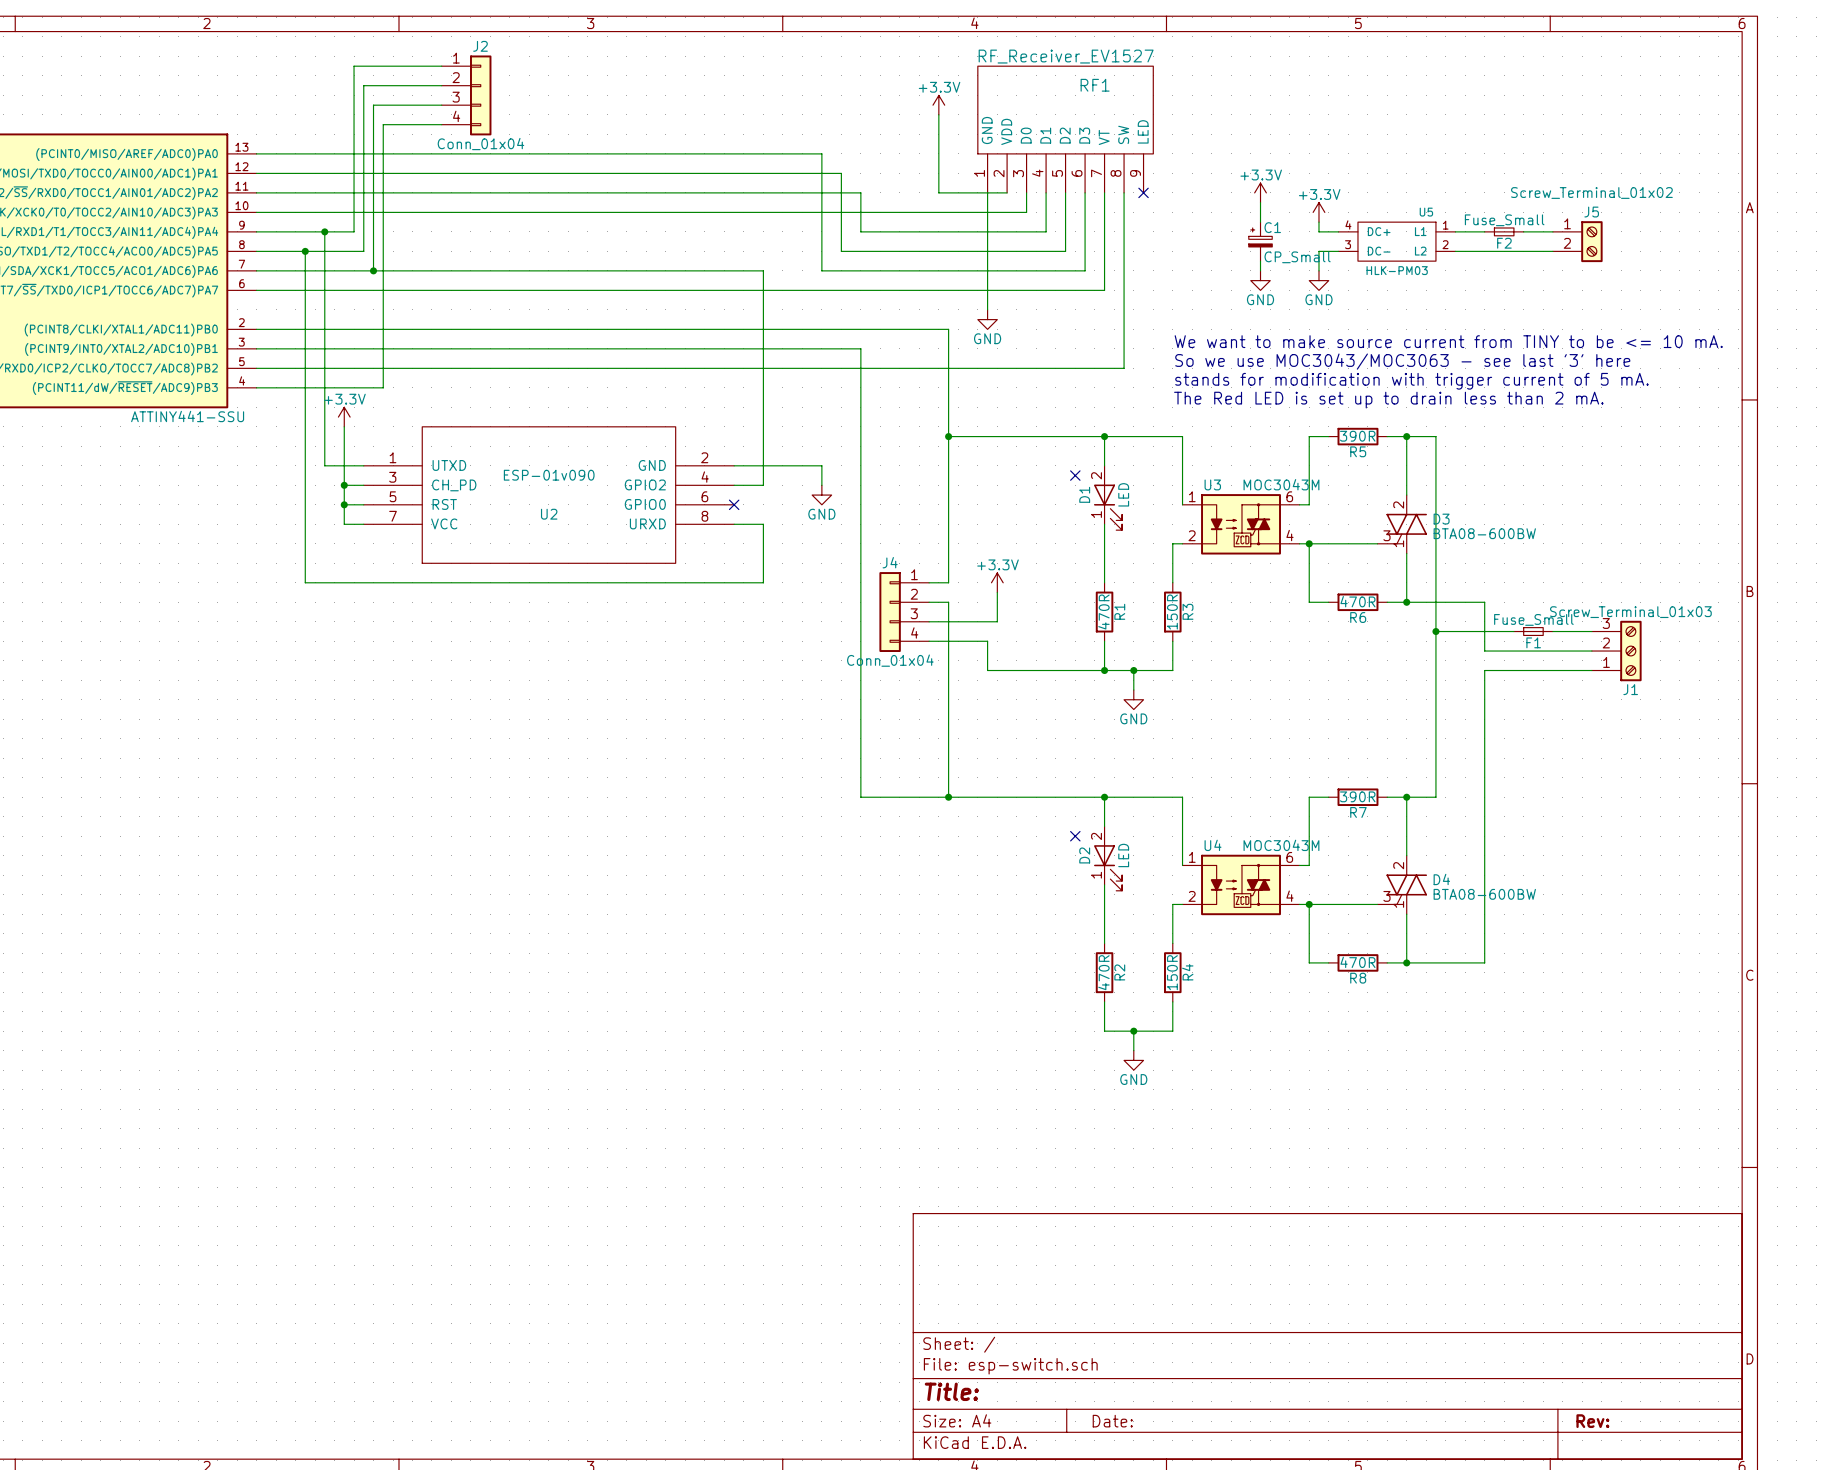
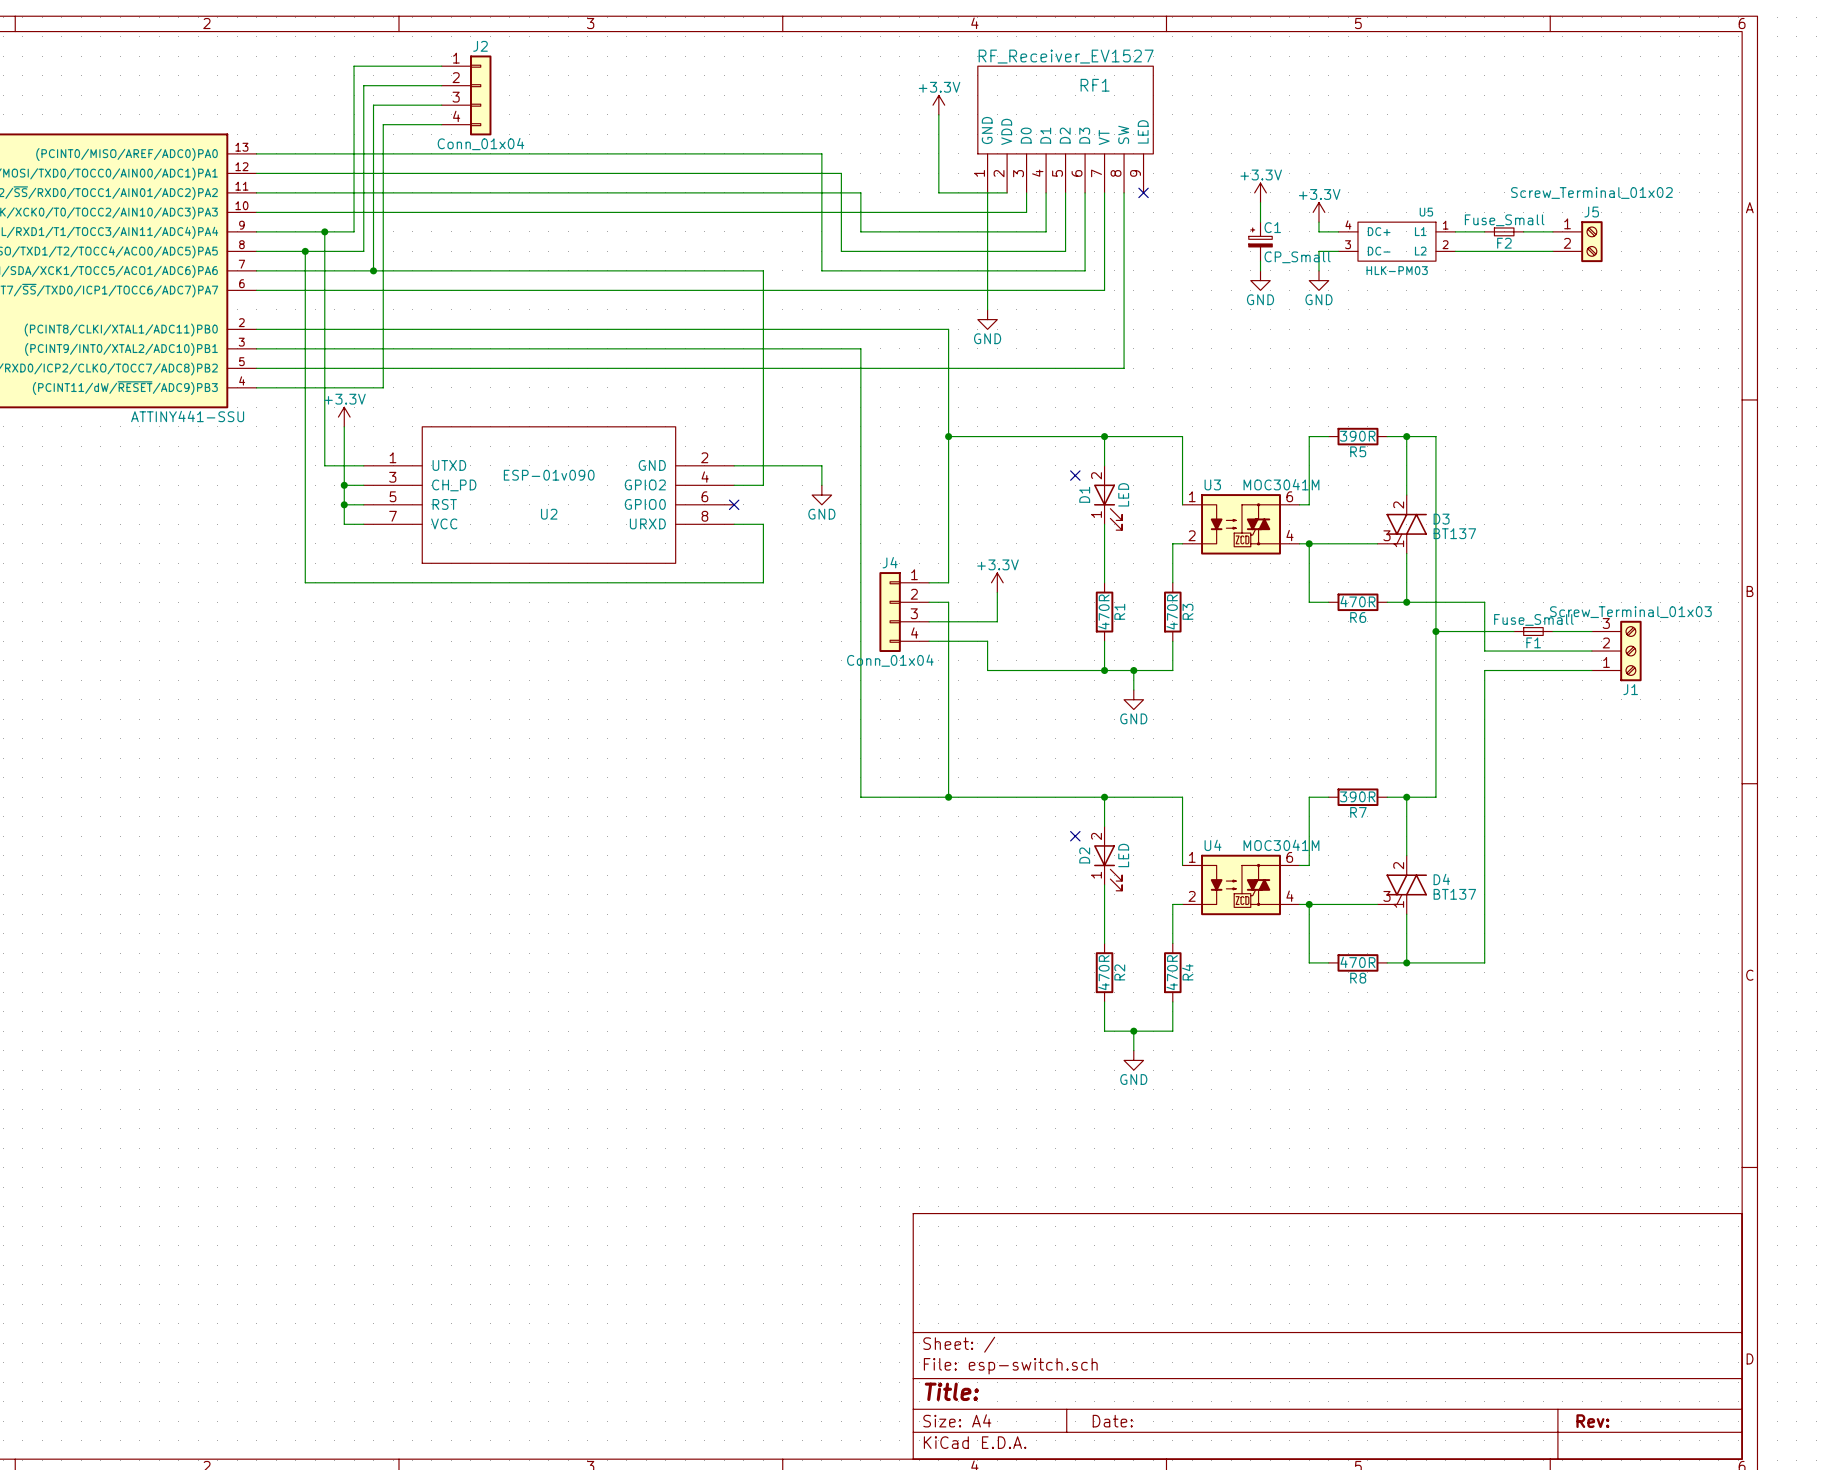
text: We want to make source current from TINY to be <= 10 mA. (1448, 341) -> none
text: So we use MOC3043/MOC3063 - see last '3' here (1402, 361) -> none
text: stands for modification with trigger current of 5 mA. (1411, 381) -> none
text: The Red LED is set up to drain less than 2 mA. (1388, 400) -> none
U3 value: MOC3043M (1281, 484) -> MOC3041M (1281, 484)
D3 value: BTA08-600BW (1484, 533) -> BT137 (1454, 533)
R3 value: 150R (1172, 612) -> 470R (1172, 612)
U4 value: MOC3043M (1281, 845) -> MOC3041M (1281, 845)
D4 value: BTA08-600BW (1484, 894) -> BT137 (1454, 894)
R4 value: 150R (1172, 972) -> 470R (1172, 972)

